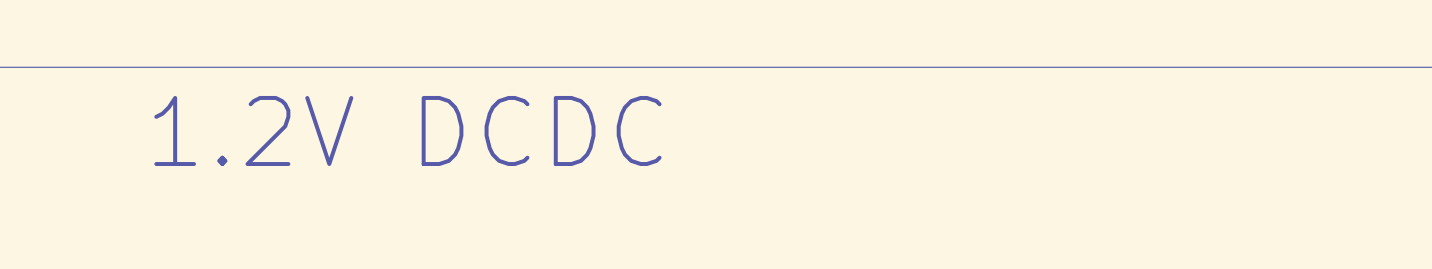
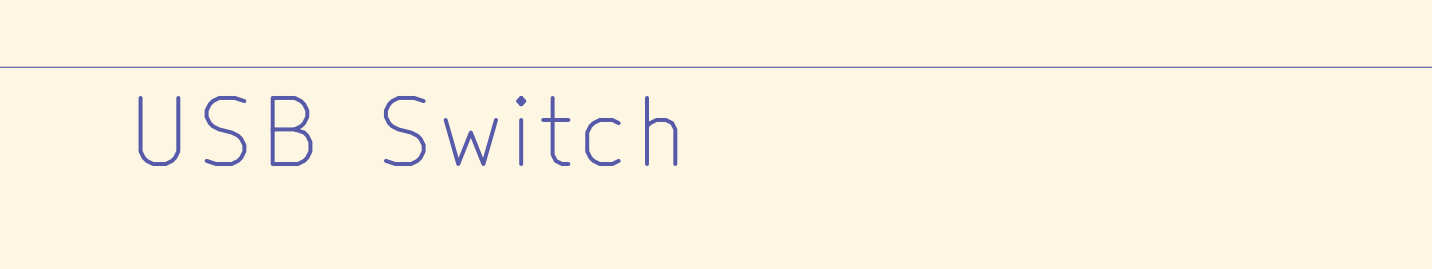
text: 1.2V DCDC (407, 130) -> USB Switch (407, 130)

